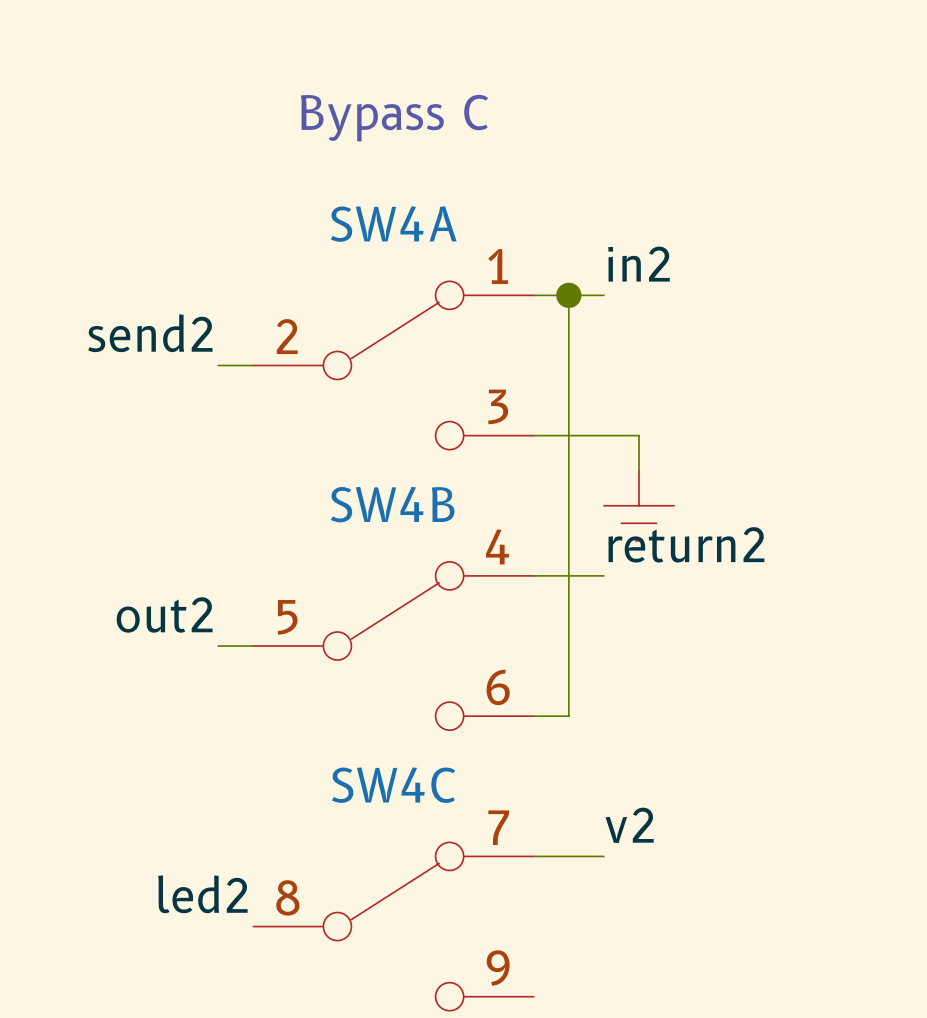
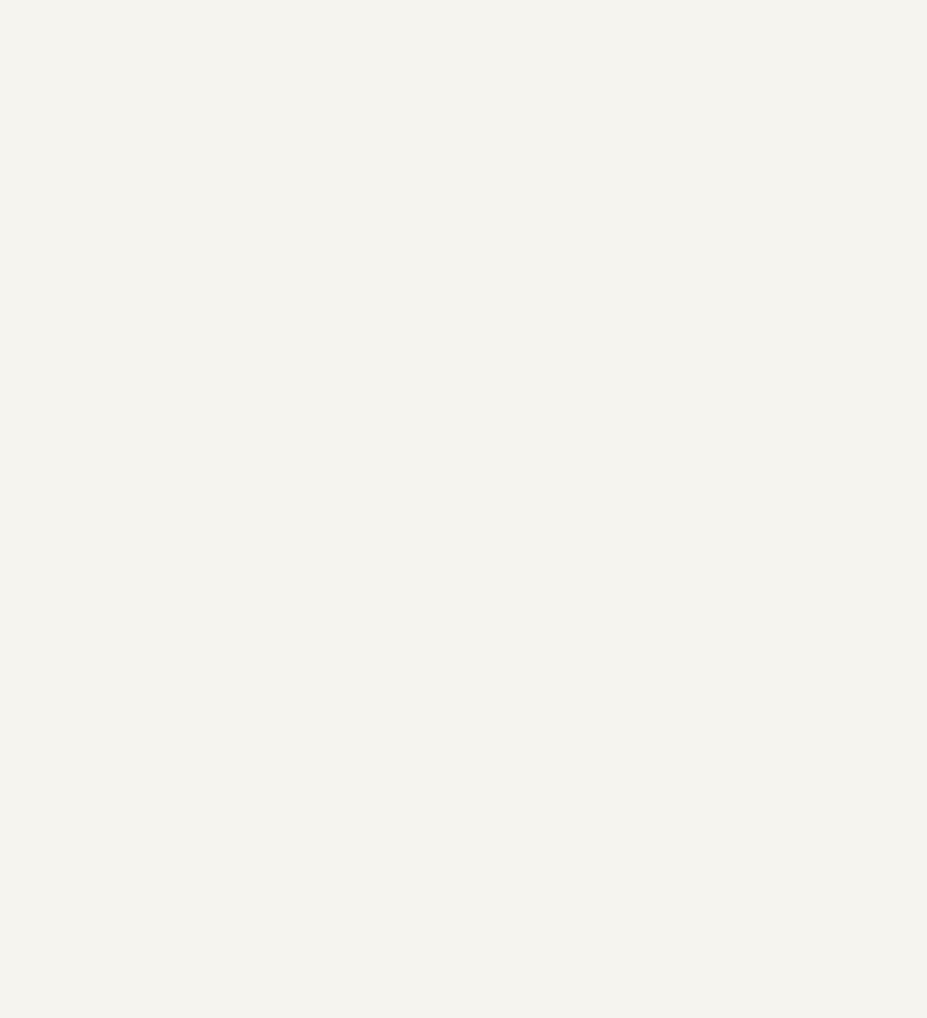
text: Bypass C (394, 118) -> none
label: in2 (639, 264) -> none
wire: (533, 295) (603, 295) -> none
wire: (568, 295) (568, 716) (533, 716) -> none
junction: (568, 295) -> none
label: send2 (150, 333) -> none
wire: (218, 365) (253, 365) -> none
SW4A: (393, 365) -> none
wire: (533, 435) (638, 435) (638, 470) -> none
power symbol: (638, 505) -> none
label: return2 (686, 544) -> none
wire: (533, 575) (603, 575) -> none
label: out2 (164, 614) -> none
wire: (218, 646) (253, 646) -> none
SW4B: (393, 646) -> none
label: v2 (629, 825) -> none
wire: (533, 856) (603, 856) -> none
label: led2 (202, 894) -> none
SW4C: (393, 926) -> none

